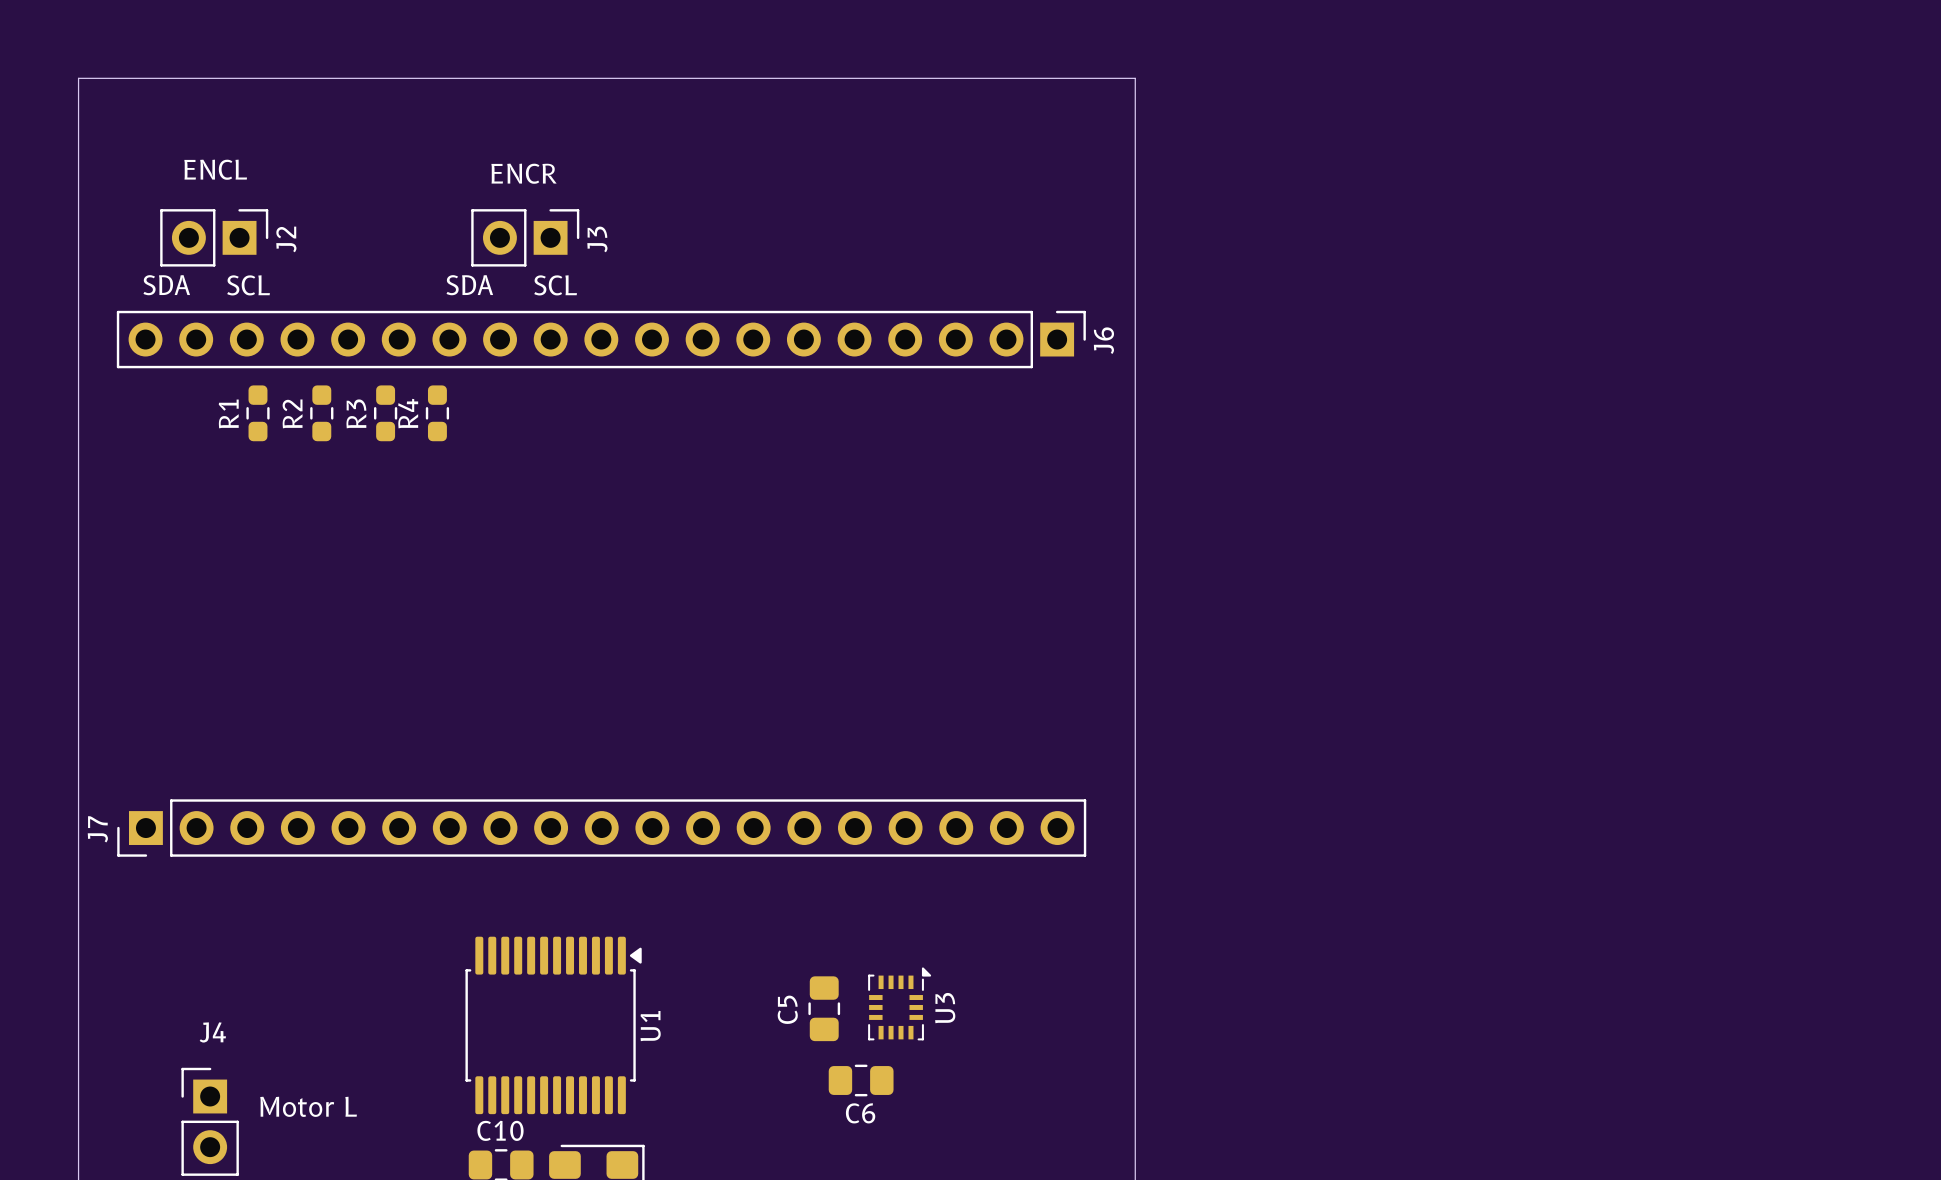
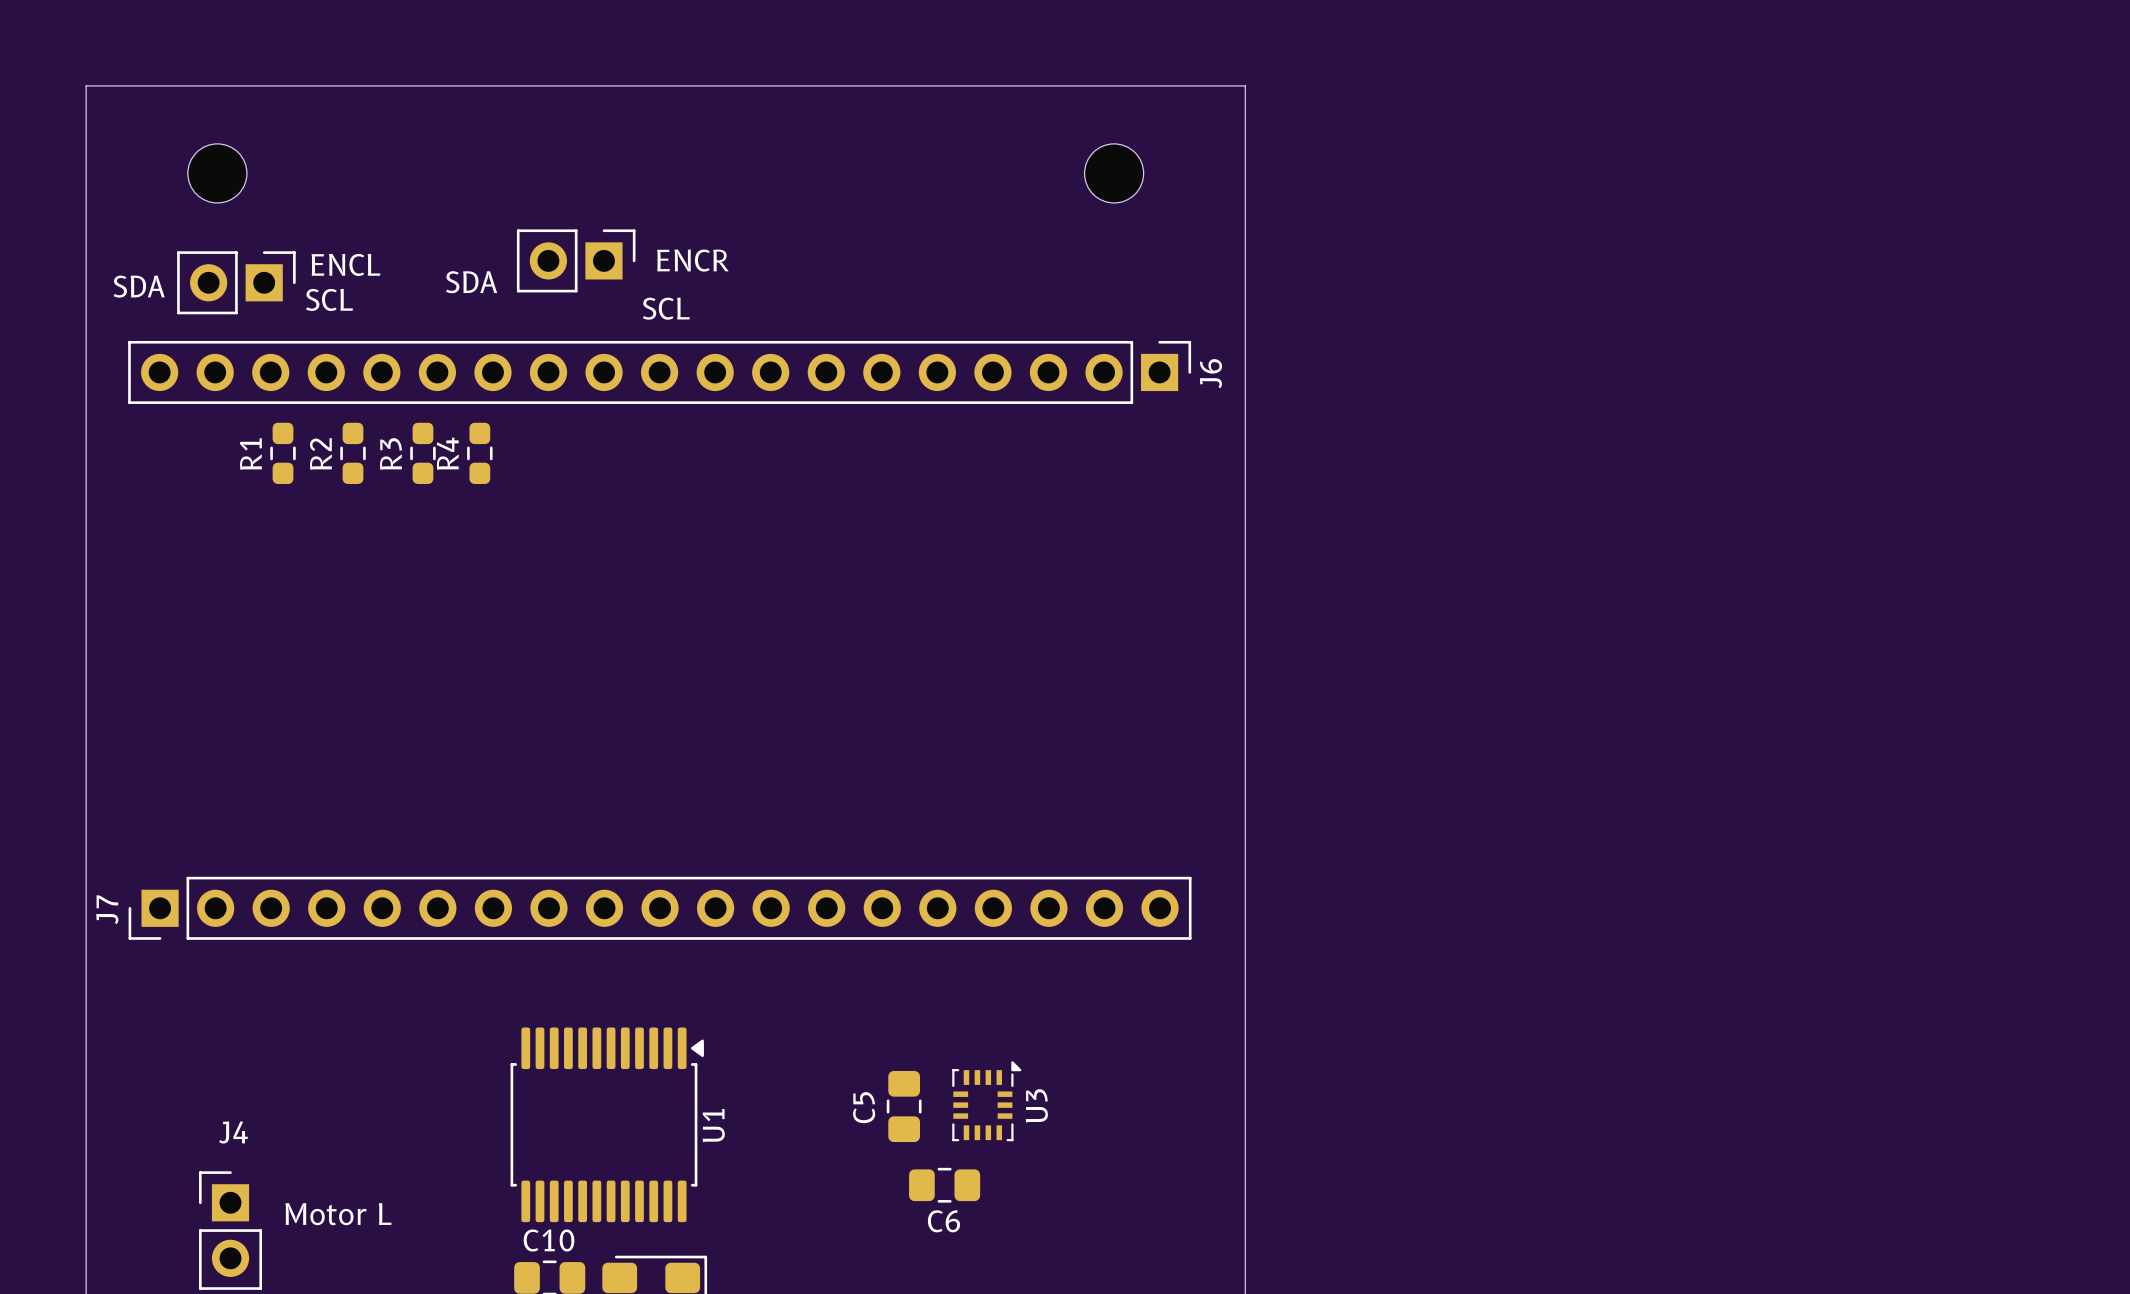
part: none -> (217, 173)
part: none -> (1114, 173)
text position: ENCL (215, 169) -> ENCL (345, 264)
text position: ENCR (523, 173) -> ENCR (692, 260)
J2: (214, 237) -> none
J3 name: J3 (597, 239) -> none
part: none -> (236, 282)
text position: SDA (166, 285) -> SDA (139, 286)
text position: SCL (248, 285) -> SCL (329, 299)
text position: SDA (469, 285) -> SDA (471, 282)
text position: SCL (555, 285) -> SCL (666, 308)

